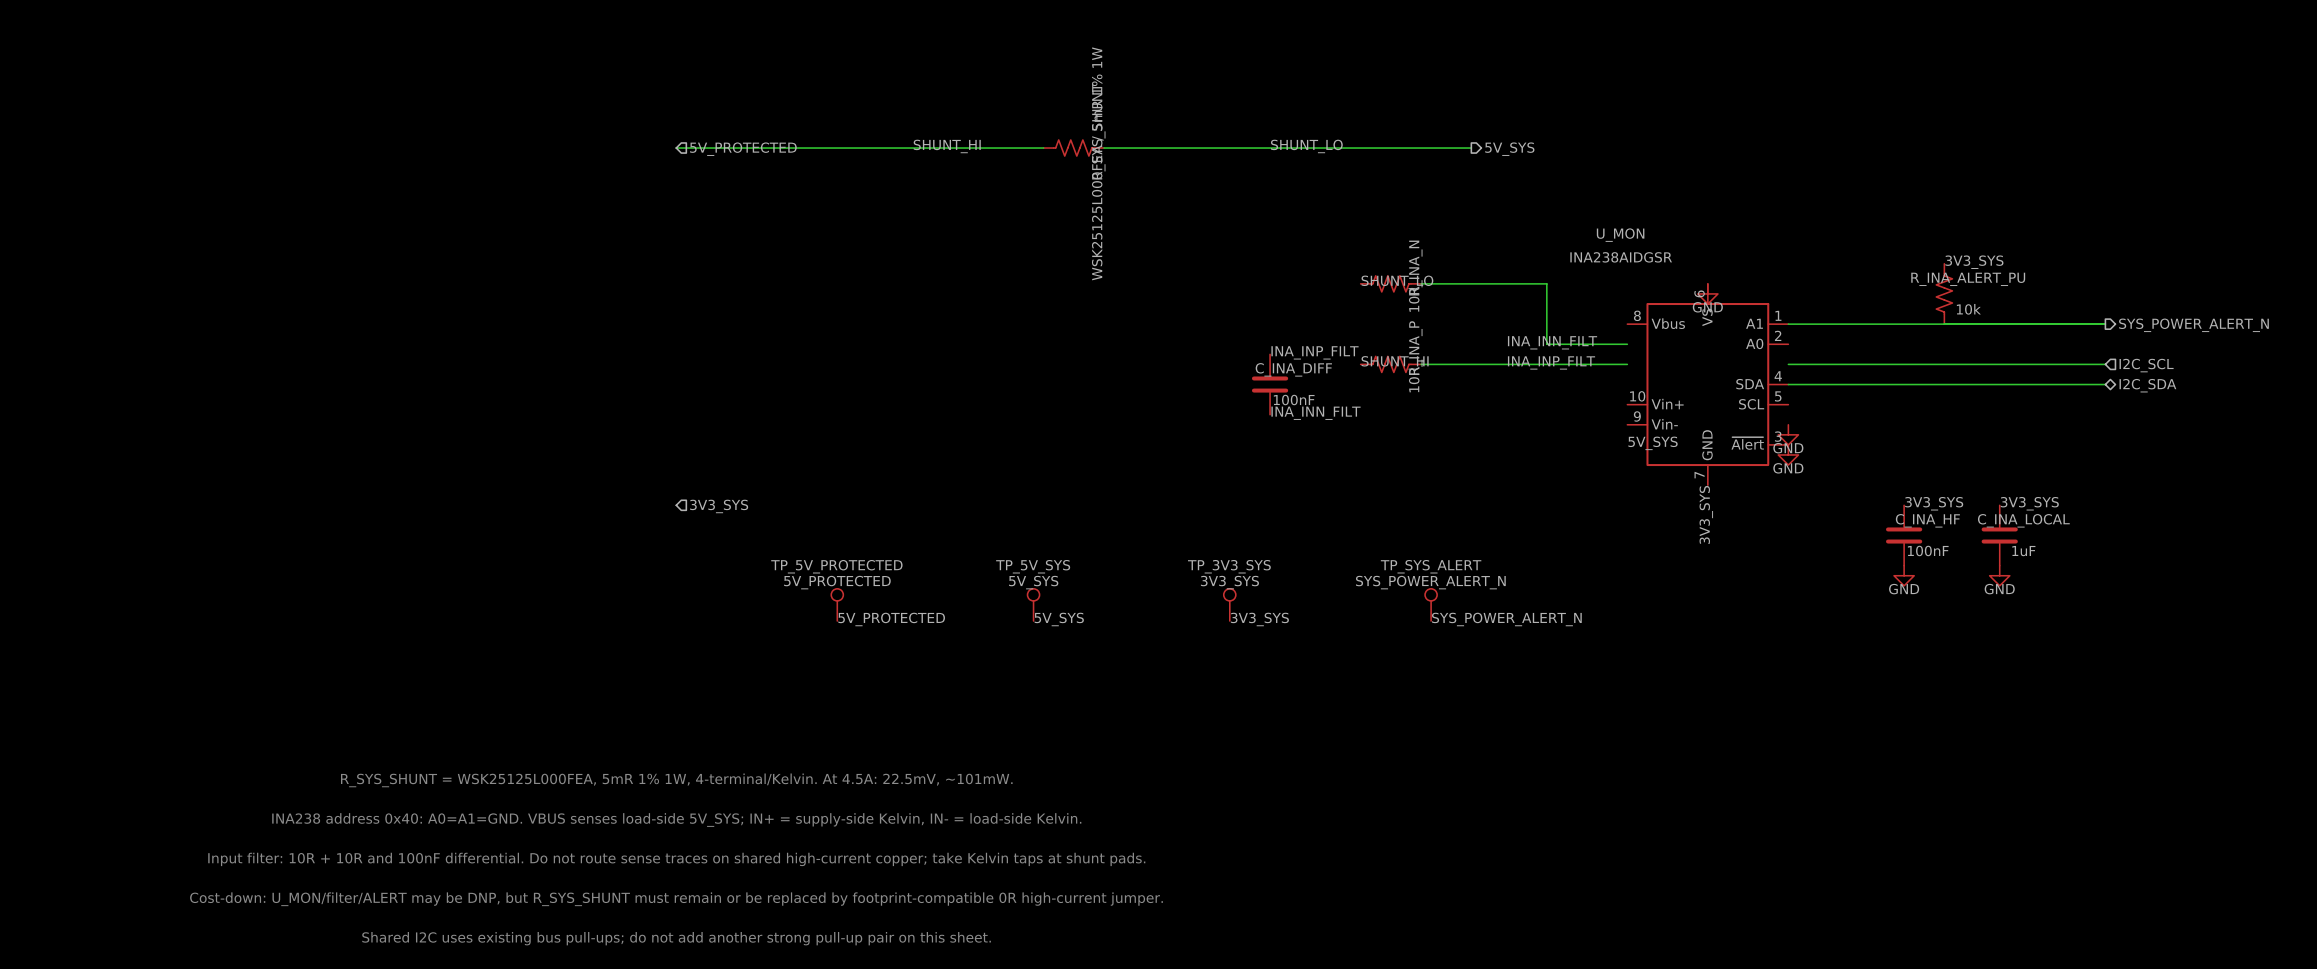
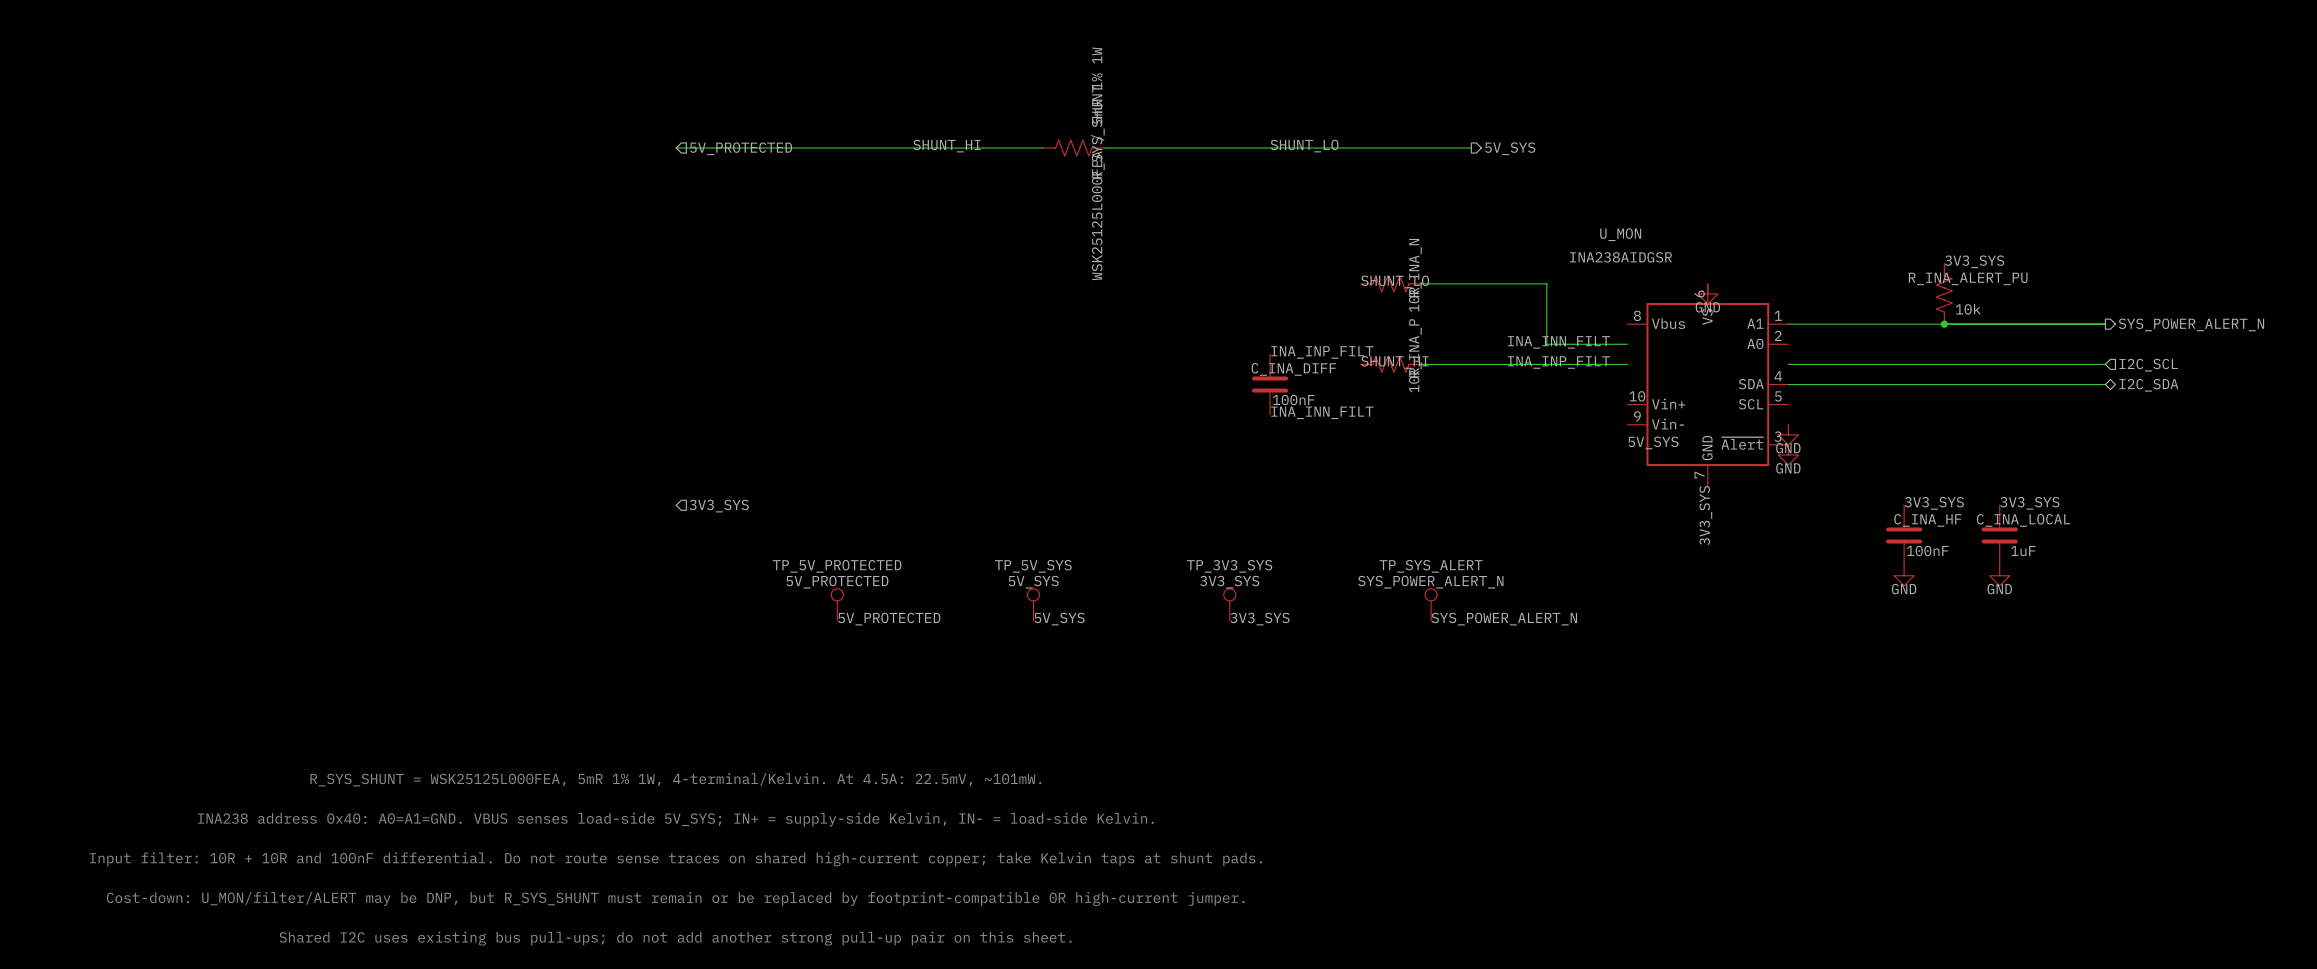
junction: none -> (1944, 324)

